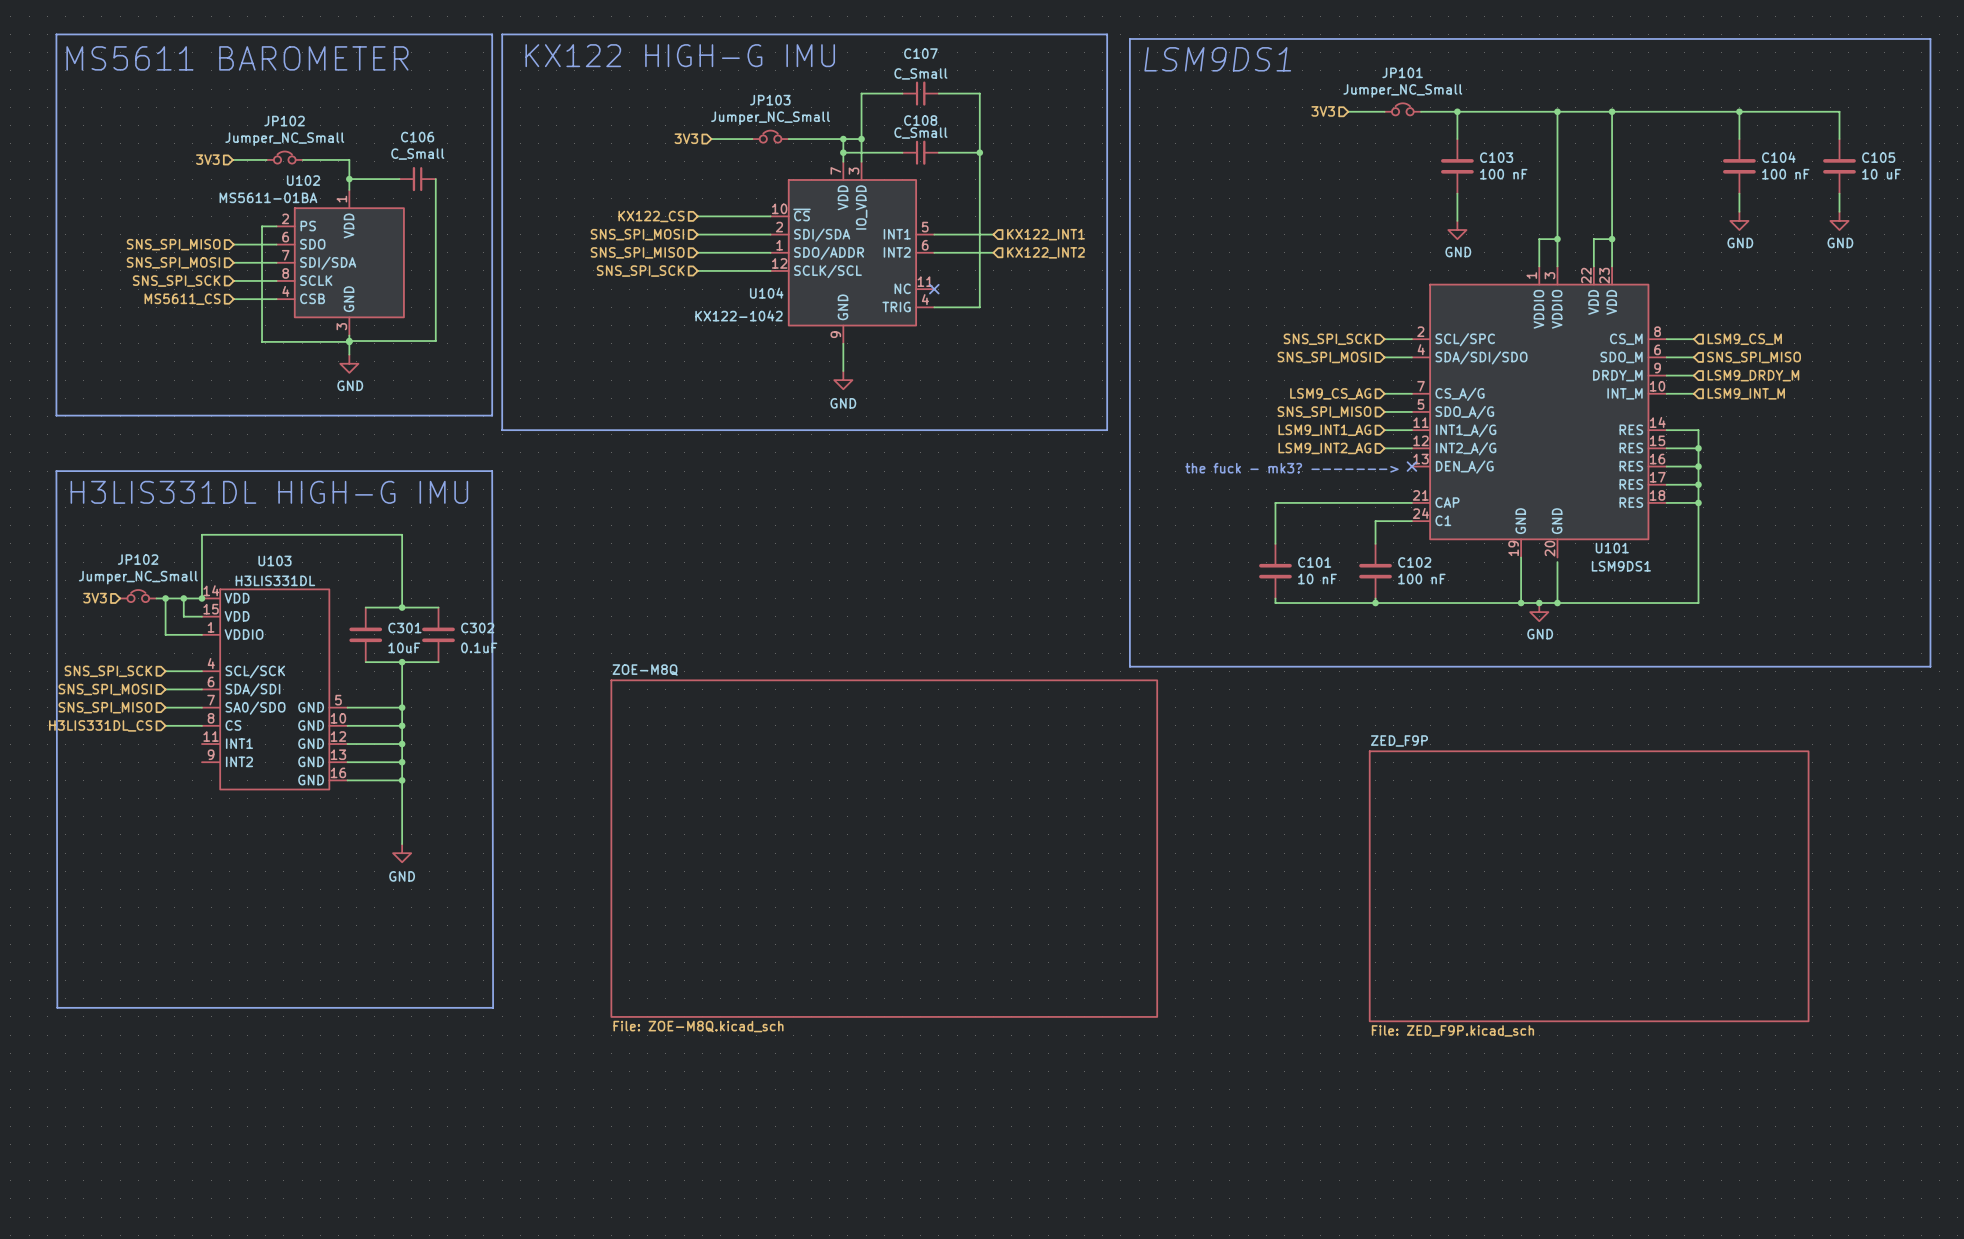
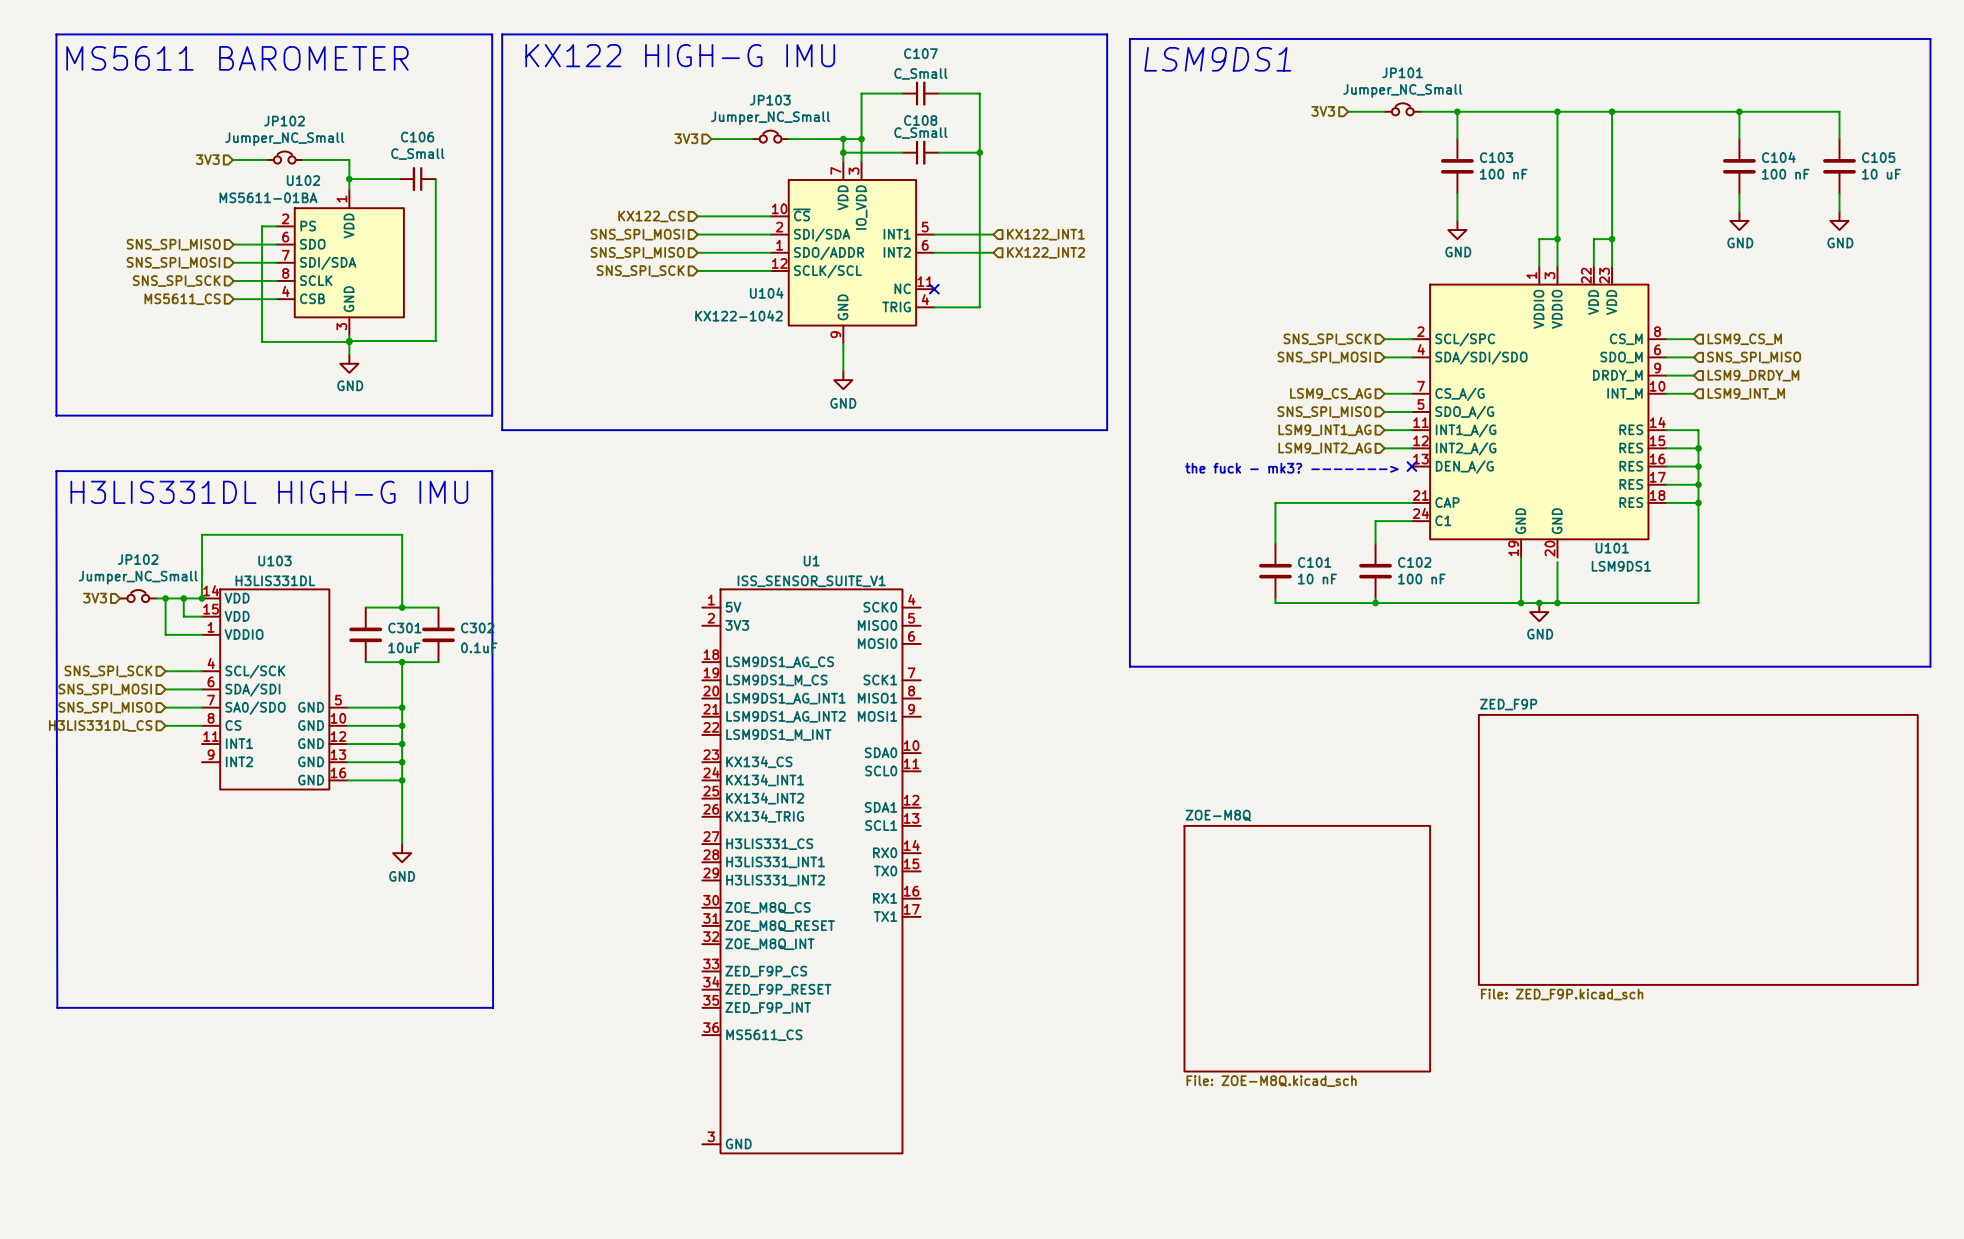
sheet ZOE-M8Q name position: ZOE-M8Q (645, 670) -> ZOE-M8Q (1218, 815)
sheet ZOE-M8Q shape: [610, 679, 1158, 1018] -> [1183, 825, 1431, 1073]
U1: none -> ISS_SENSOR_SUITE_V1 (811, 871)
sheet ZED_F9P position: (1589, 886) -> (1698, 849)
sheet ZOE-M8Q value position: File: ZOE-M8Q.kicad_sch (698, 1026) -> File: ZOE-M8Q.kicad_sch (1271, 1081)

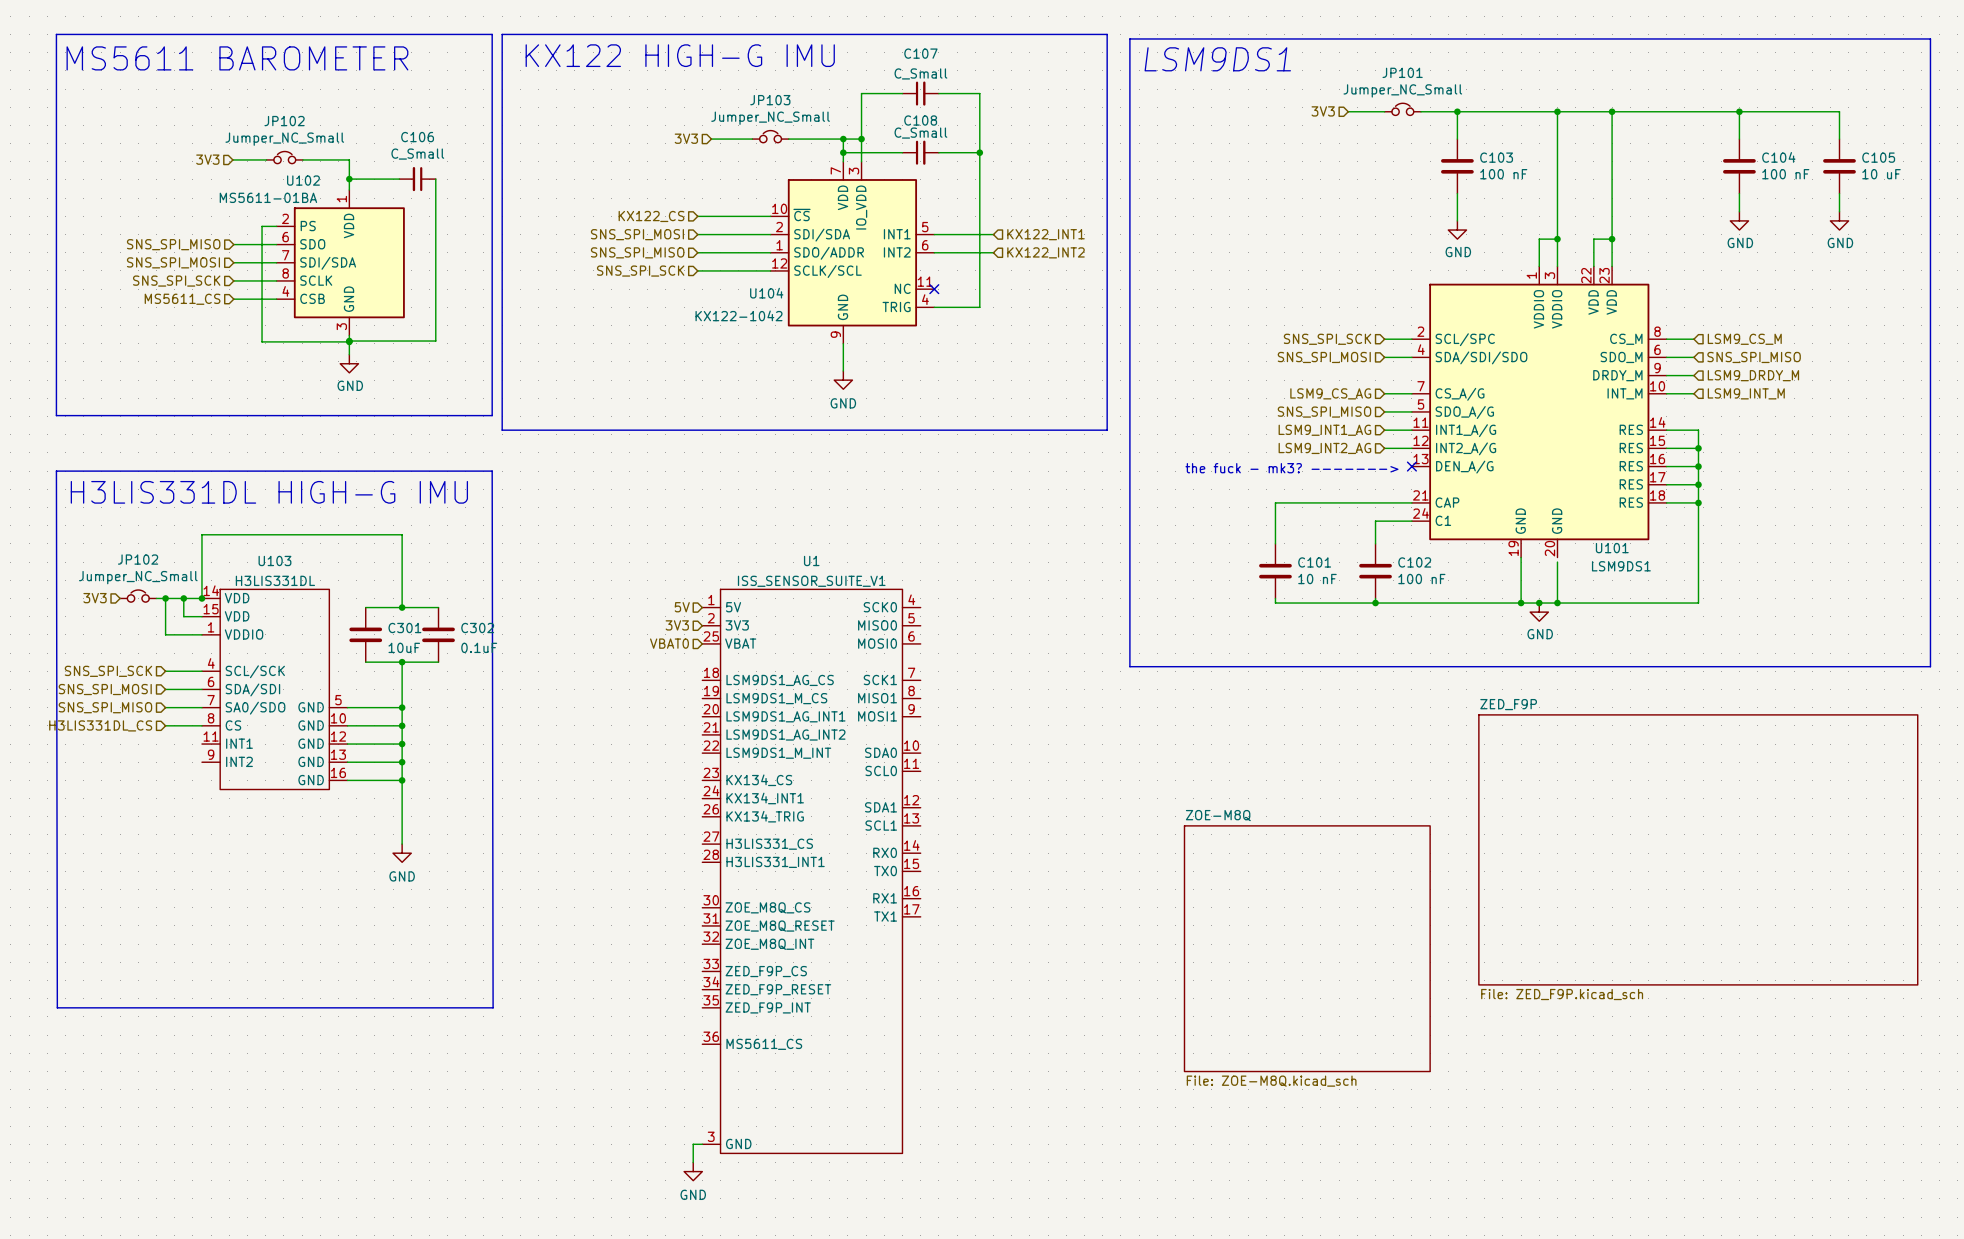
U1 symbol: [702, 588, 921, 1154] -> [702, 588, 921, 1154]
hierarchical label: none -> 5V (682, 607)
hierarchical label: none -> 3V3 (677, 625)
hierarchical label: none -> VBAT0 (669, 643)
wire: none -> (702, 1144) (693, 1144) (693, 1162)
power symbol: none -> GND (693, 1171)

